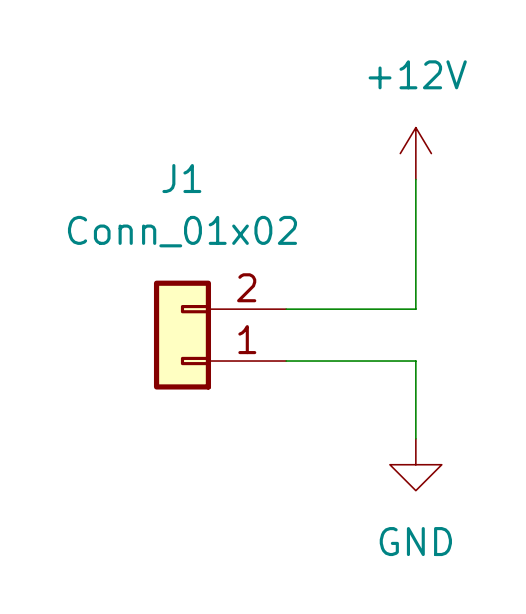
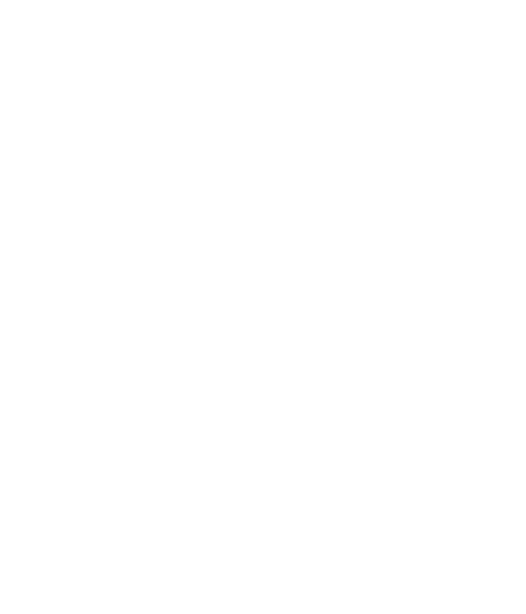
power symbol: +12V (415, 153) -> none
wire: (415, 179) (415, 309) (286, 309) -> none
J1: Conn_01x02 (220, 335) -> none
wire: (286, 361) (415, 361) (415, 438) -> none
power symbol: GND (415, 464) -> none

